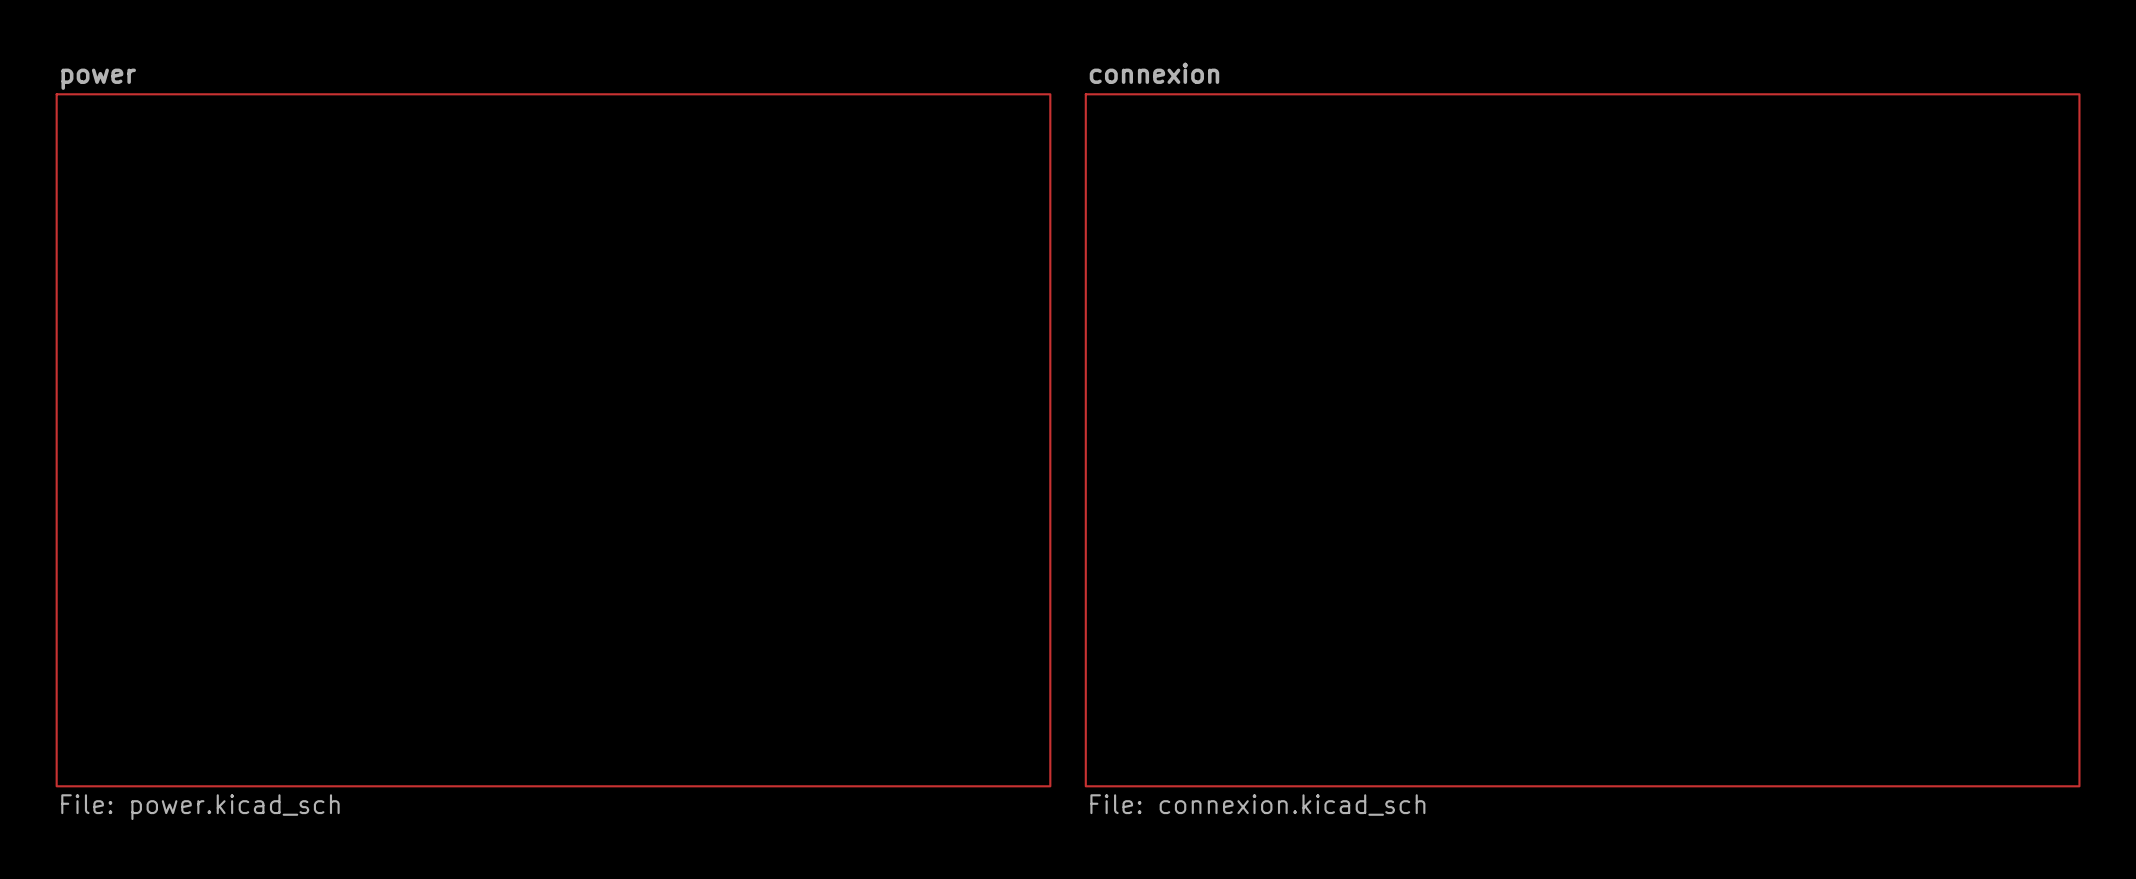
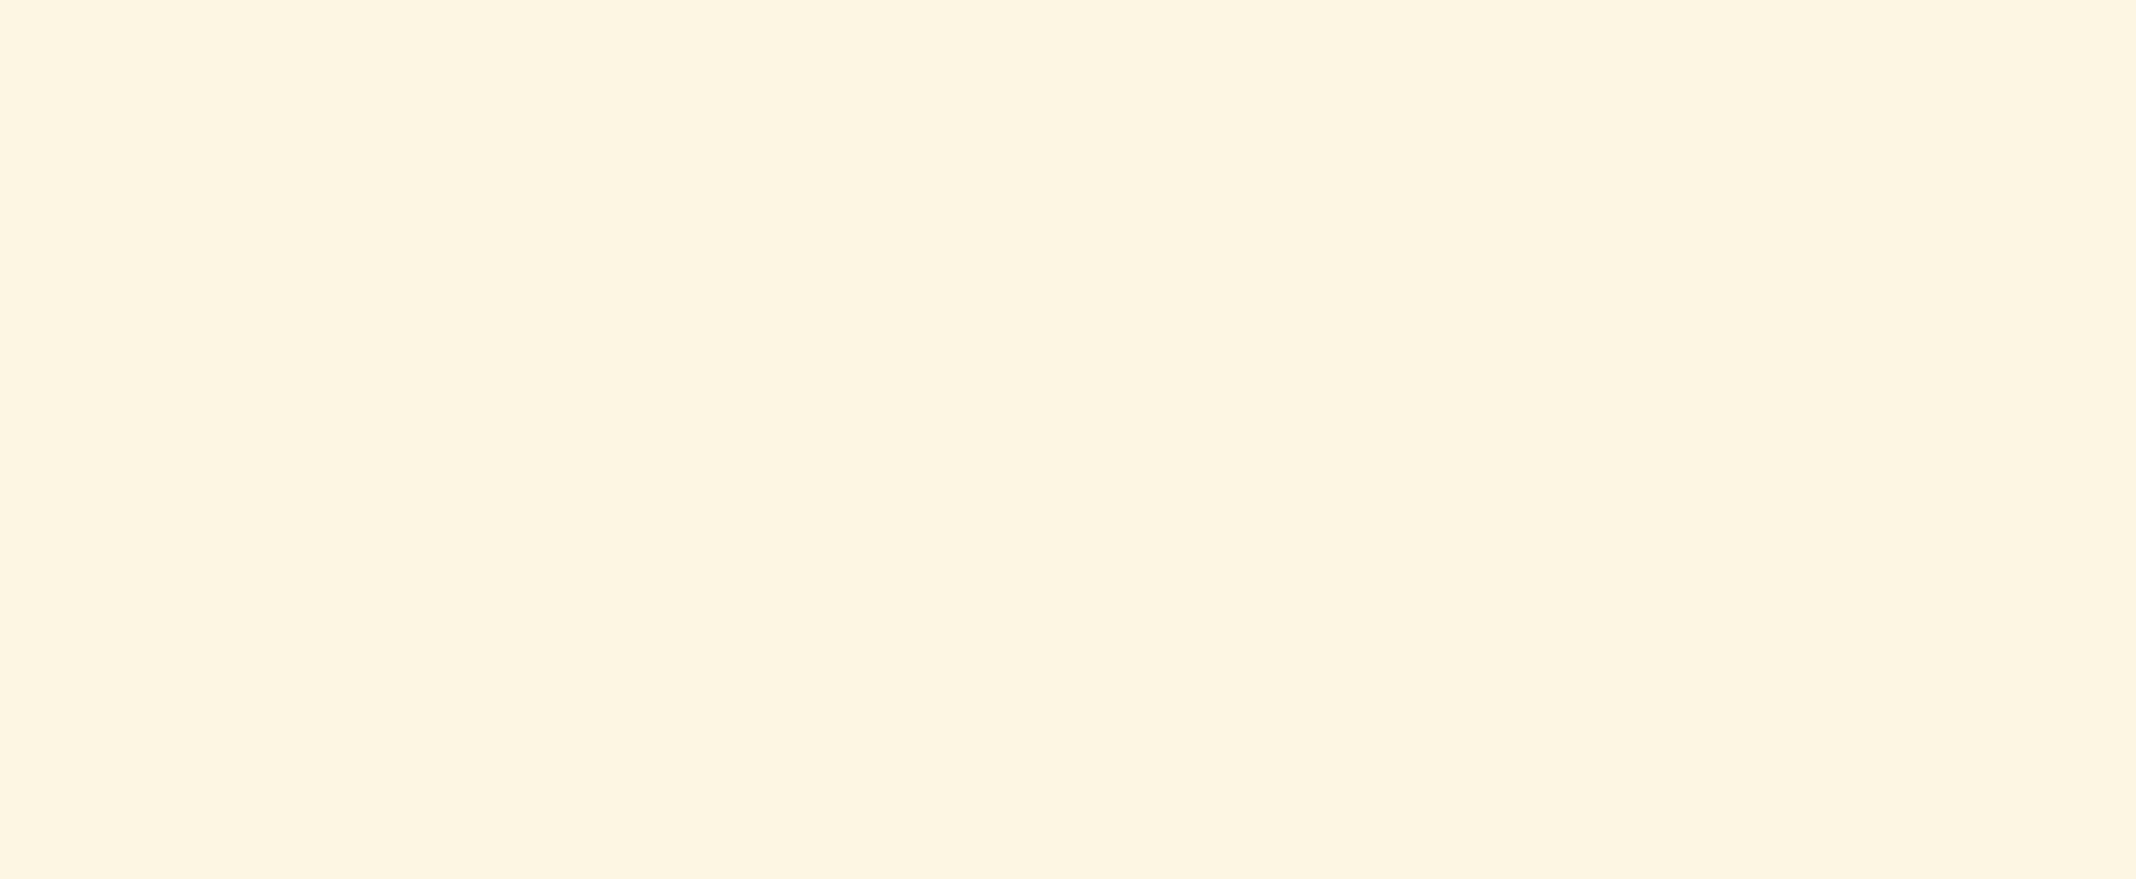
sheet power: File: power.kicad_sch (553, 440) -> none
sheet connexion: File: connexion.kicad_sch (1582, 440) -> none

